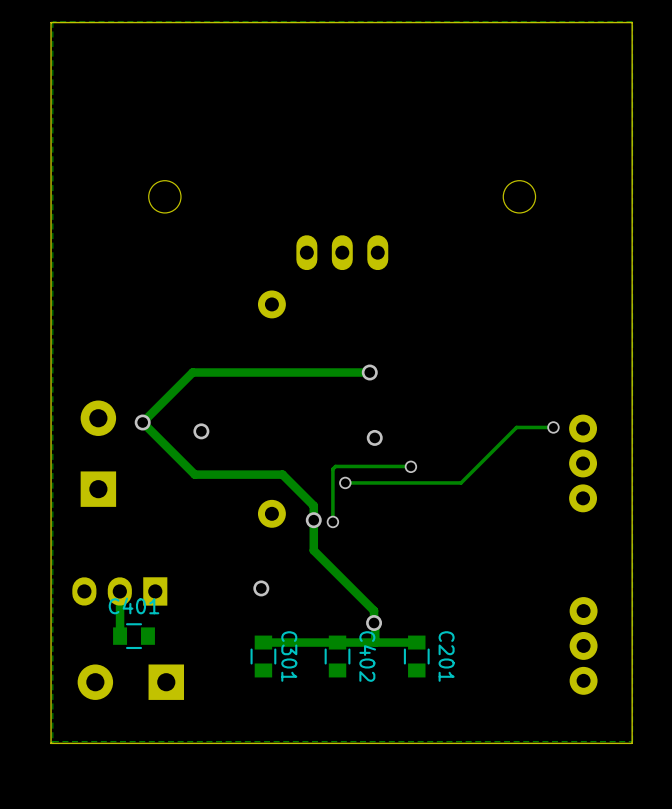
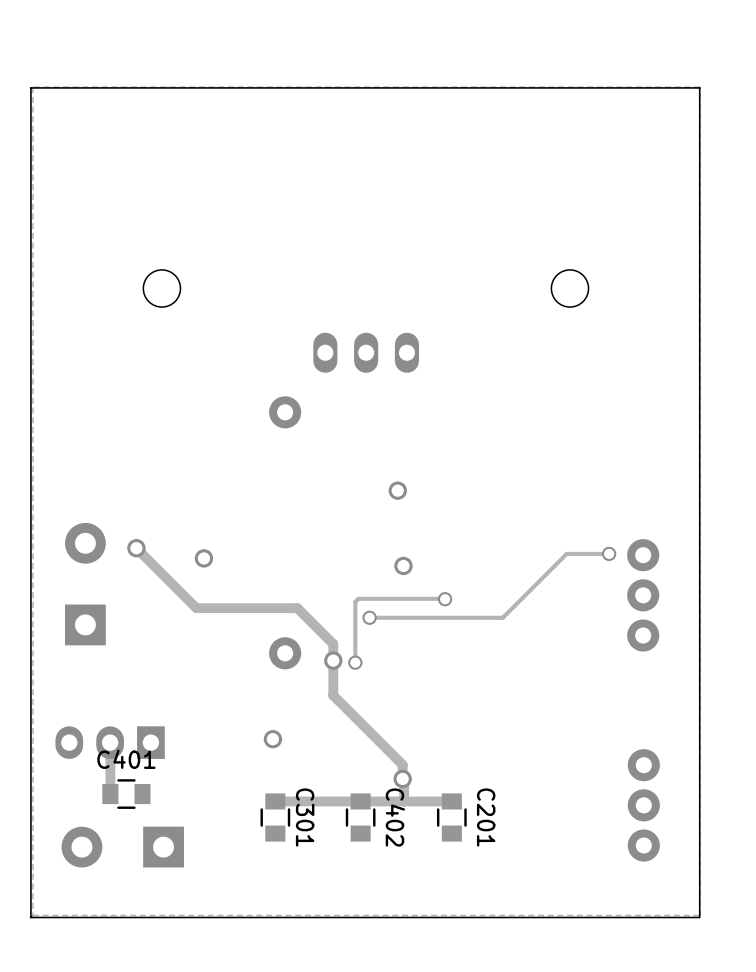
track: (369, 372) (192, 372) (142, 422) -> none

